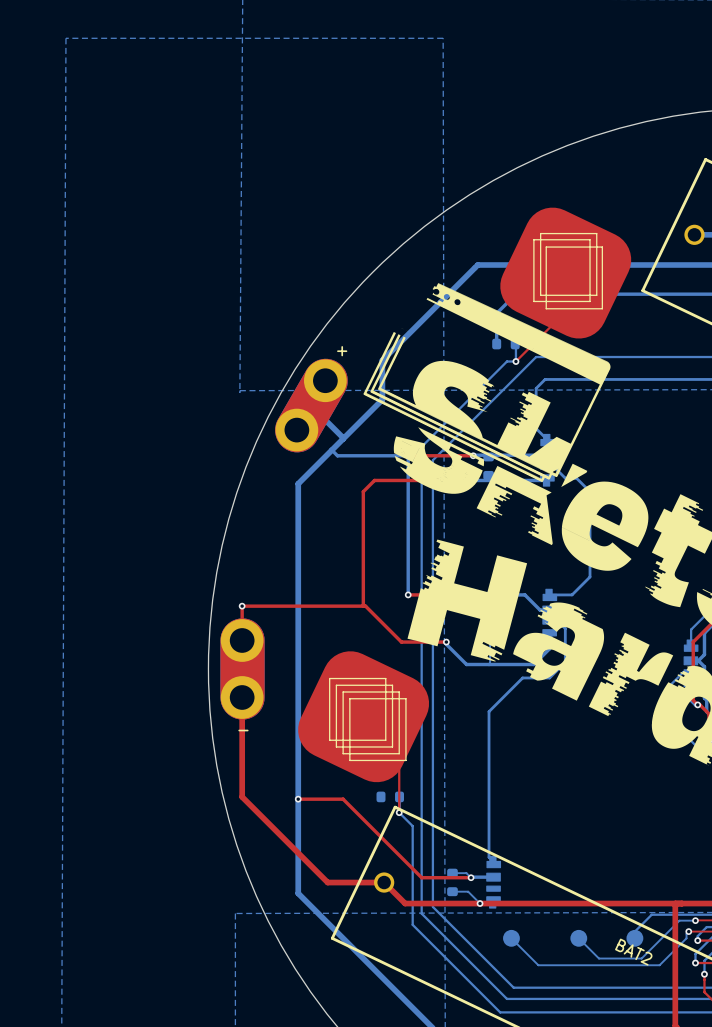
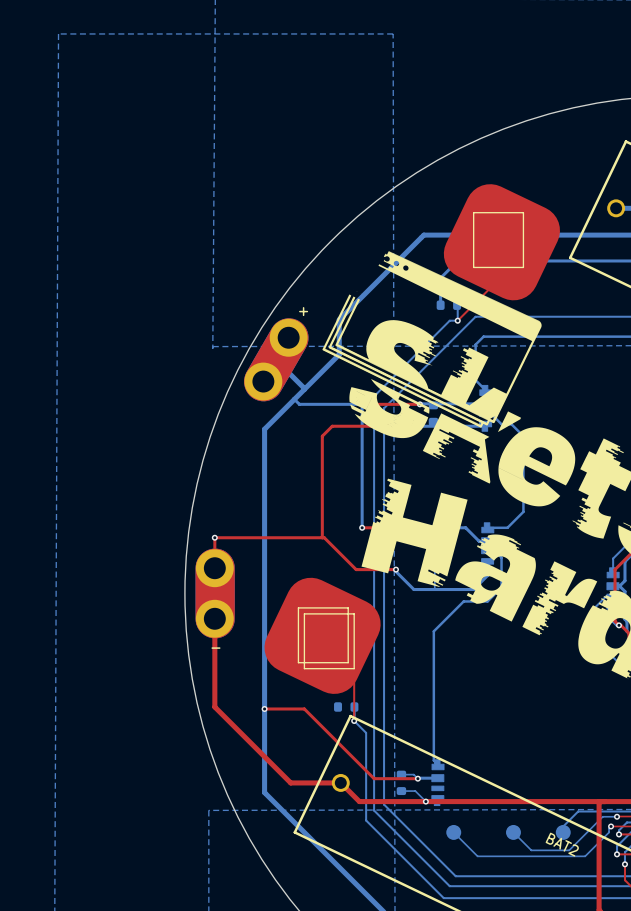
line: (540, 233) (596, 233) (596, 295) (540, 295) (540, 233) -> none
line: (546, 247) (602, 247) (602, 308) (546, 308) (546, 247) -> none
line: (329, 678) (385, 678) (385, 740) (329, 740) (329, 678) -> none
line: (349, 698) (405, 698) (405, 760) (349, 760) (349, 698) -> none

